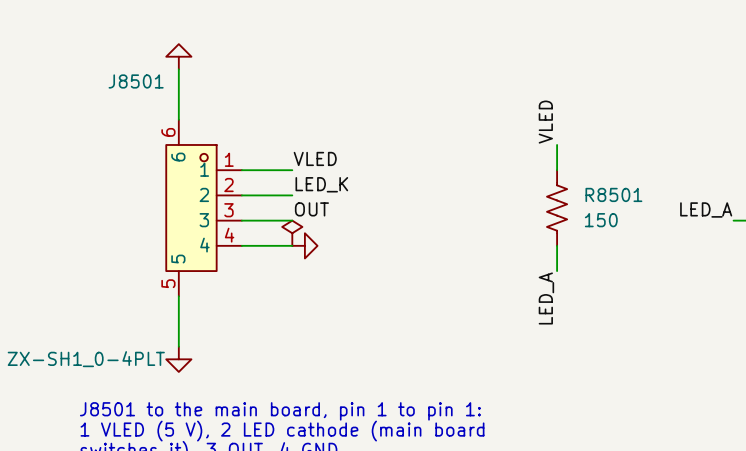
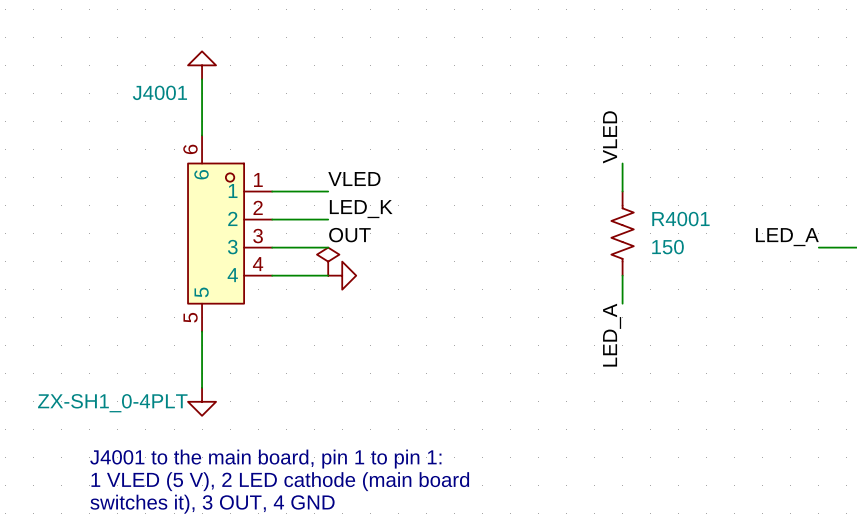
J8501 name: J8501 (136, 81) -> J4001 (159, 92)
R8501 name: R8501 (613, 194) -> R4001 (680, 219)
text: J8501 to the main board, pin 1 to pin 1: (280, 411) -> J4001 to the main board, pin 1 to pin 1: (265, 459)

